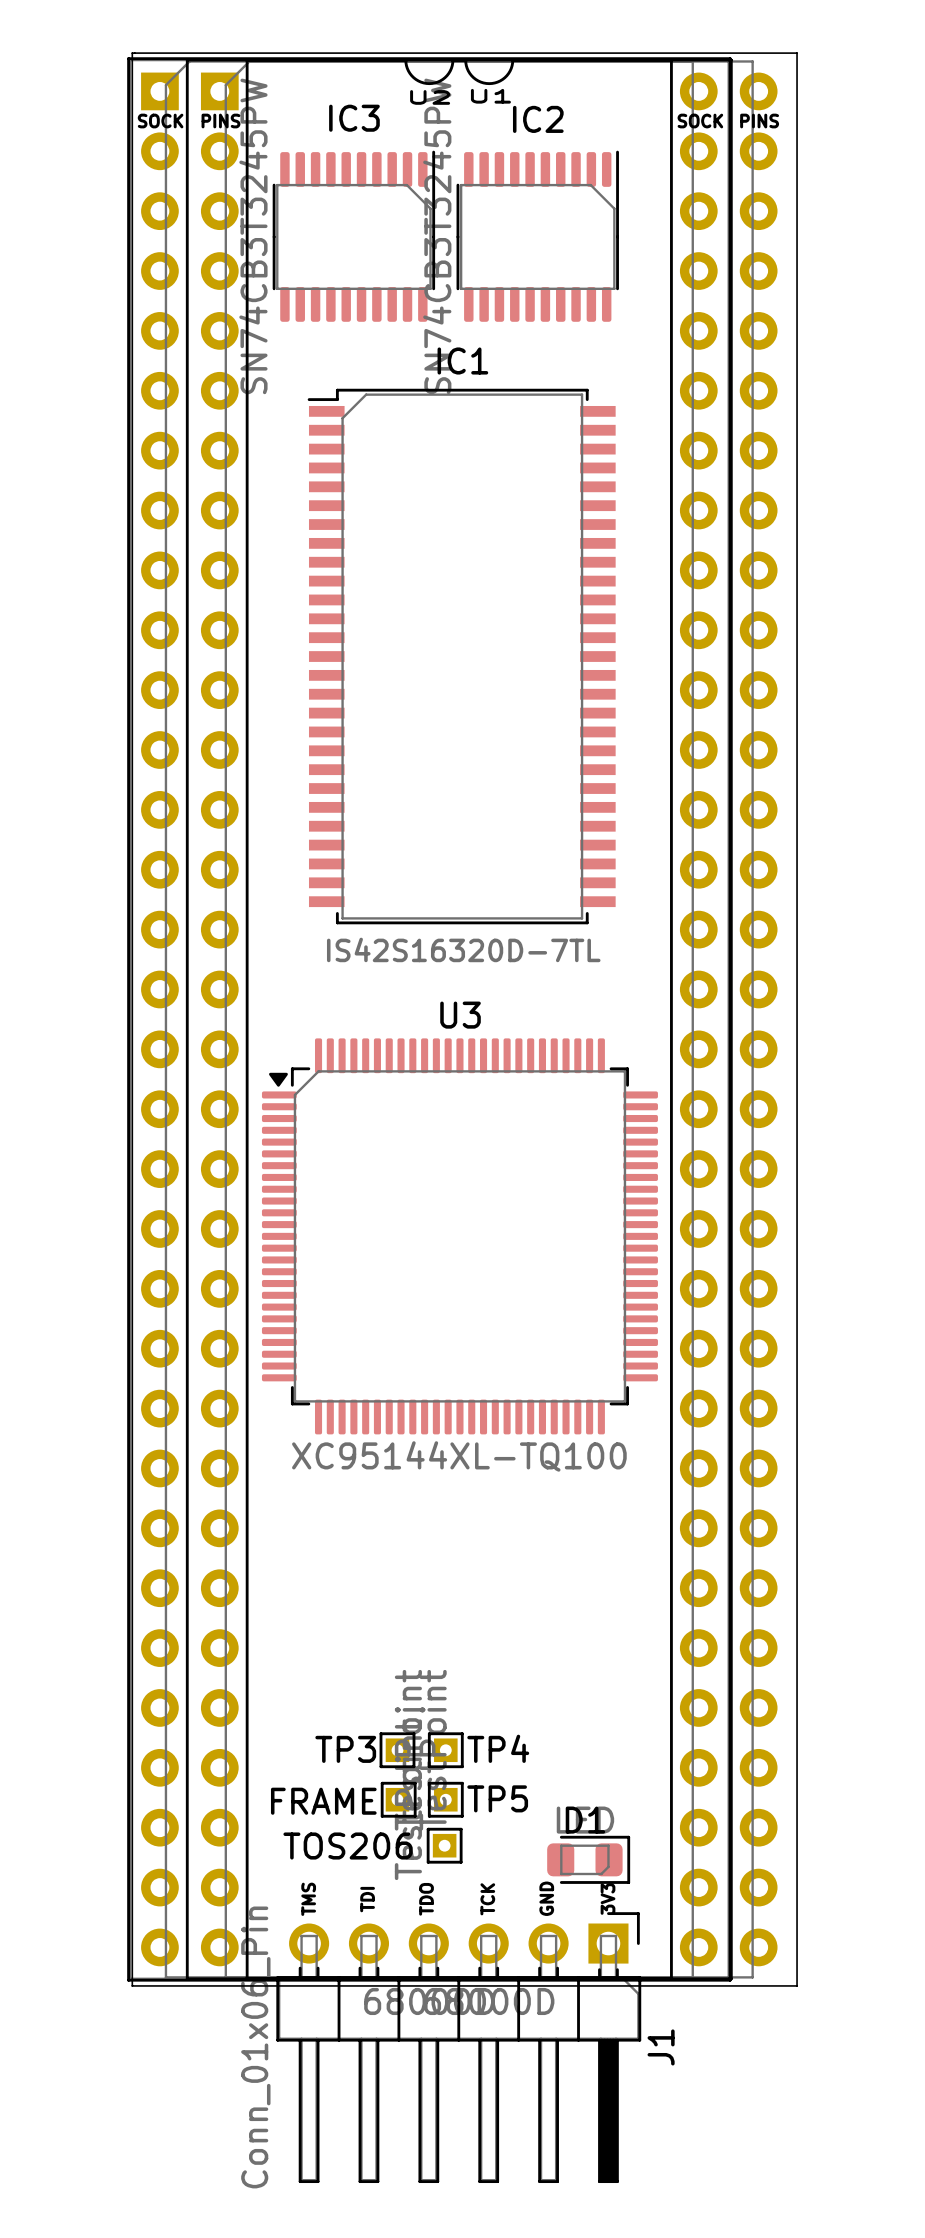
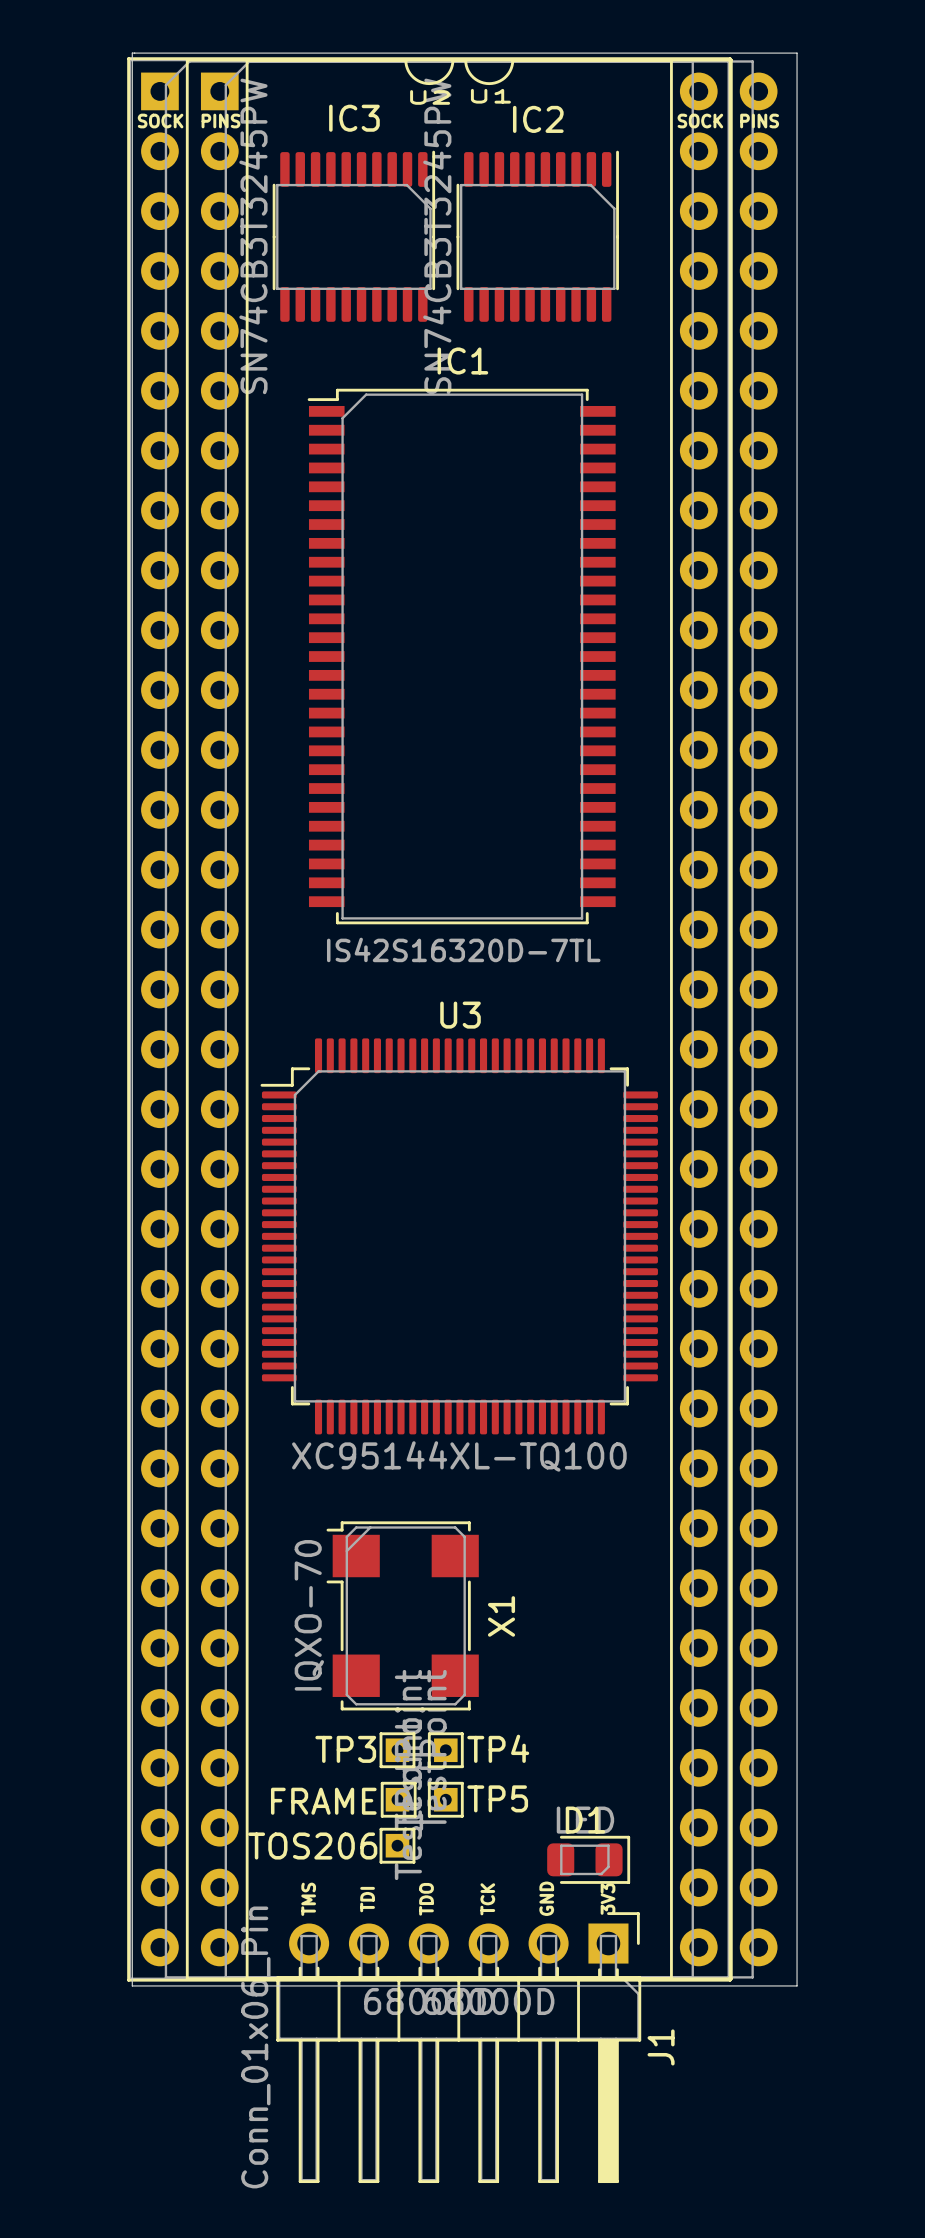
U3 footprint: [261, 1038, 658, 1435] -> [260, 1038, 658, 1435]
X1: none -> IQXO-70 (402, 1615)
part position: (444, 1845) -> (397, 1845)
text position: TOS206 (348, 1846) -> TOS206 (312, 1846)

